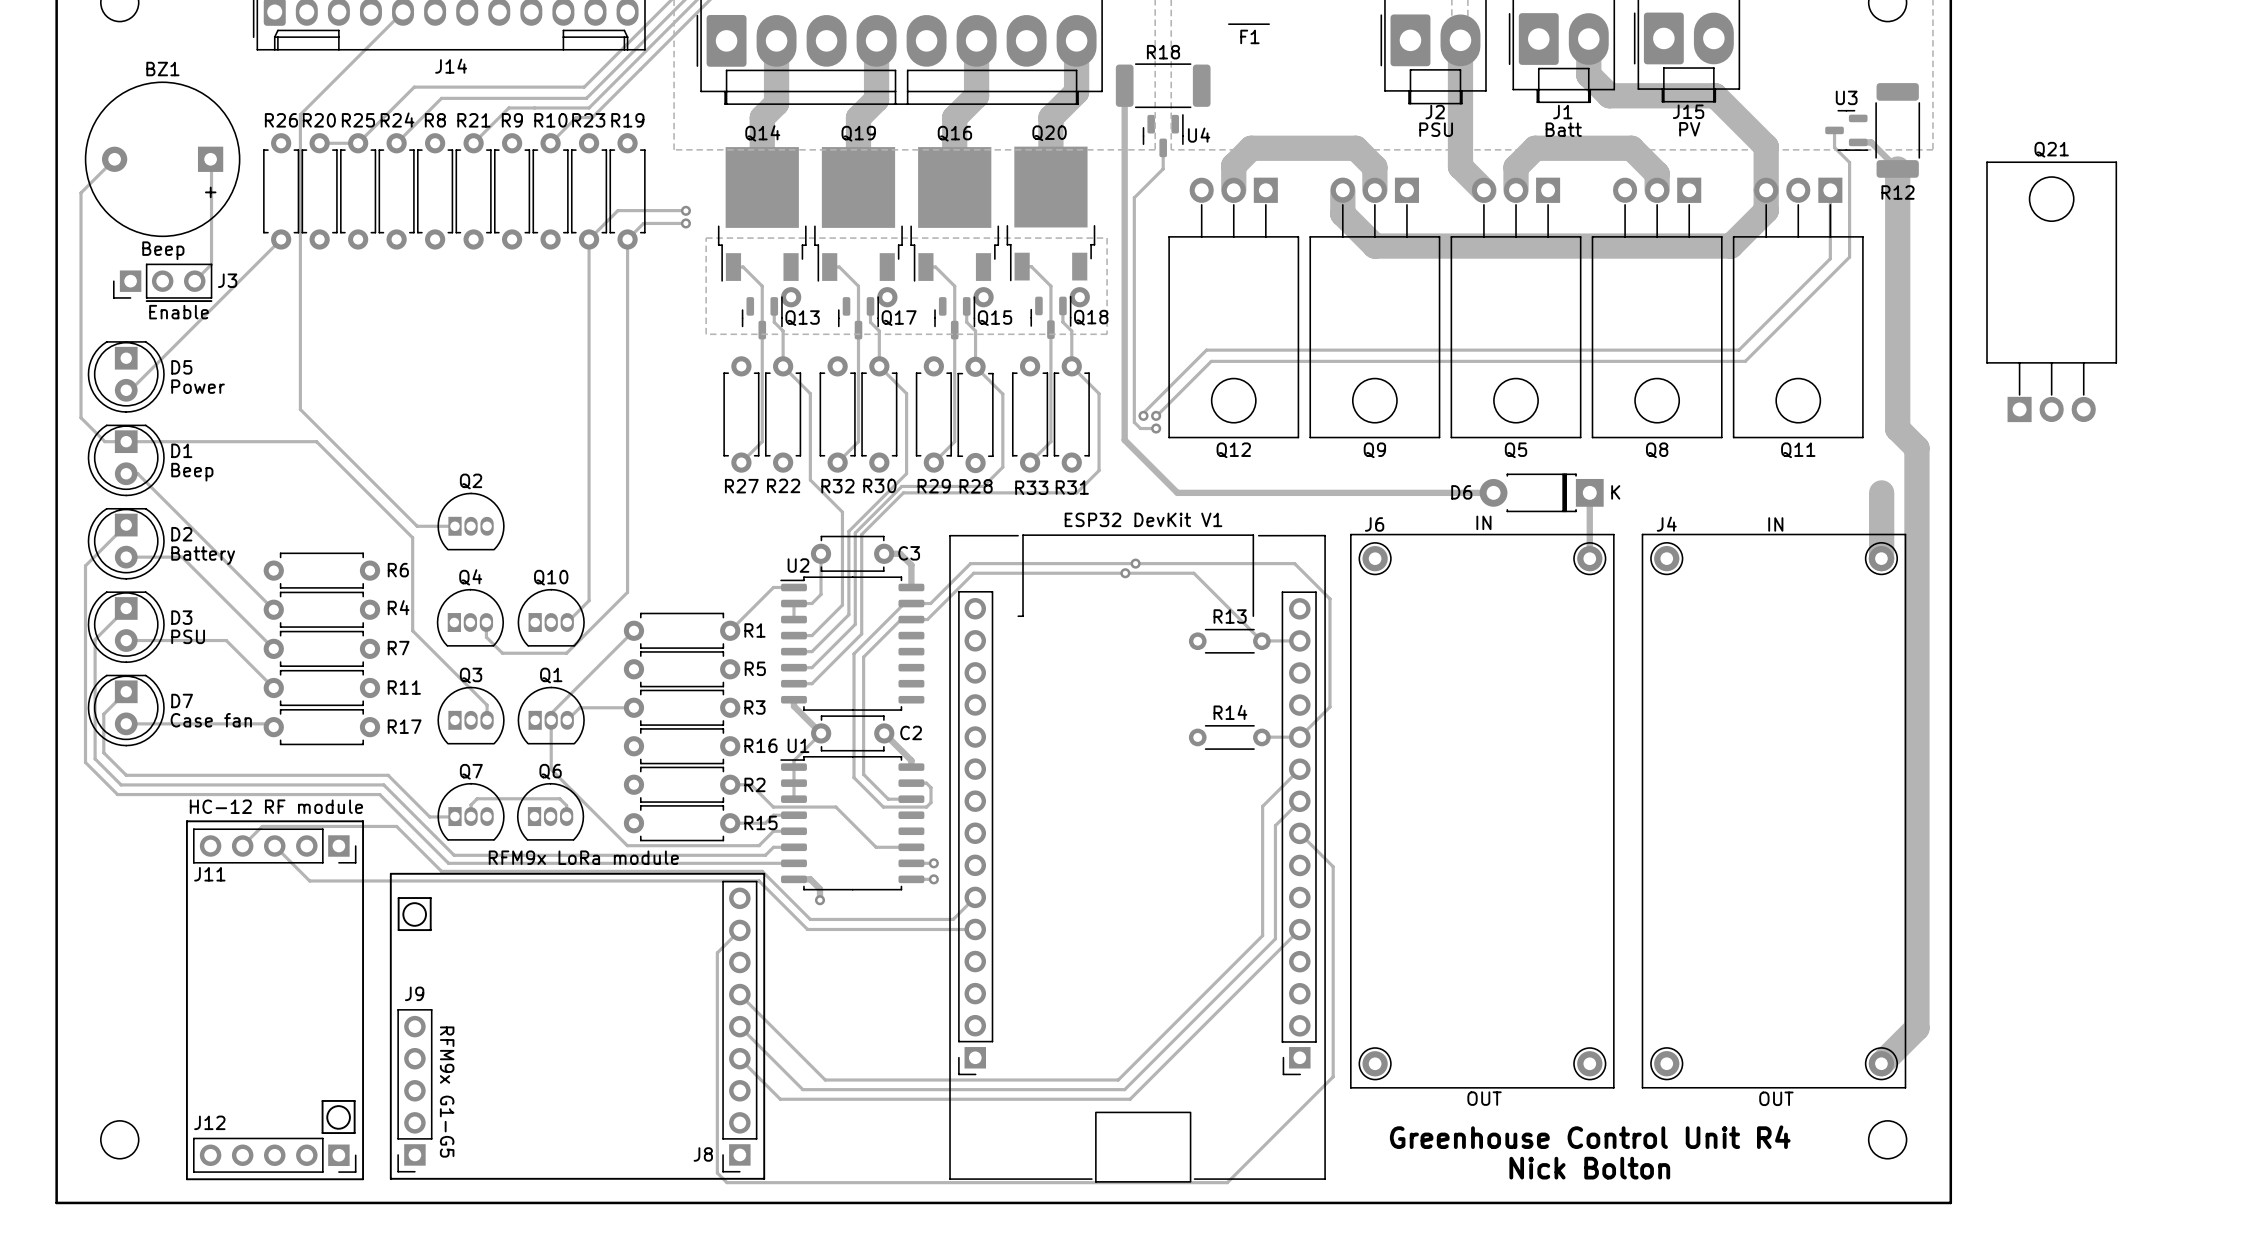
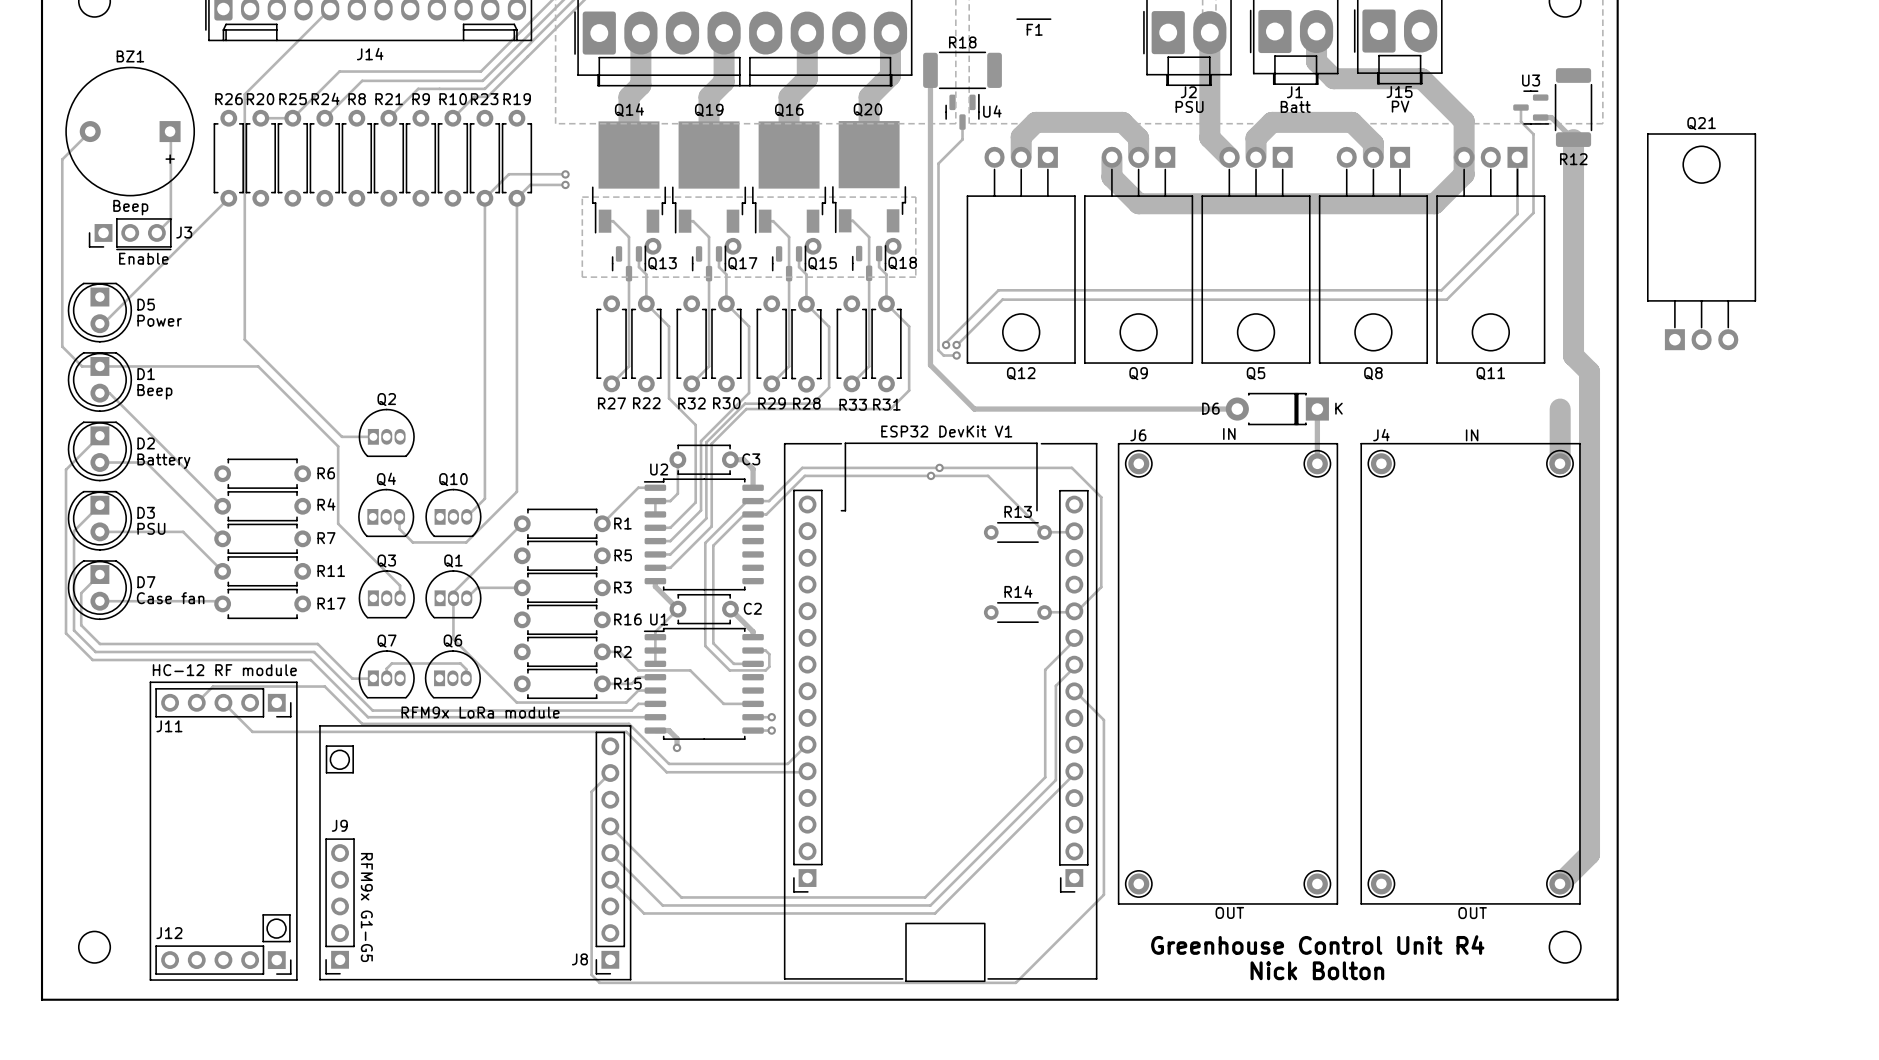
part footprint: [949, 534, 1326, 1183] -> [784, 442, 1098, 982]

